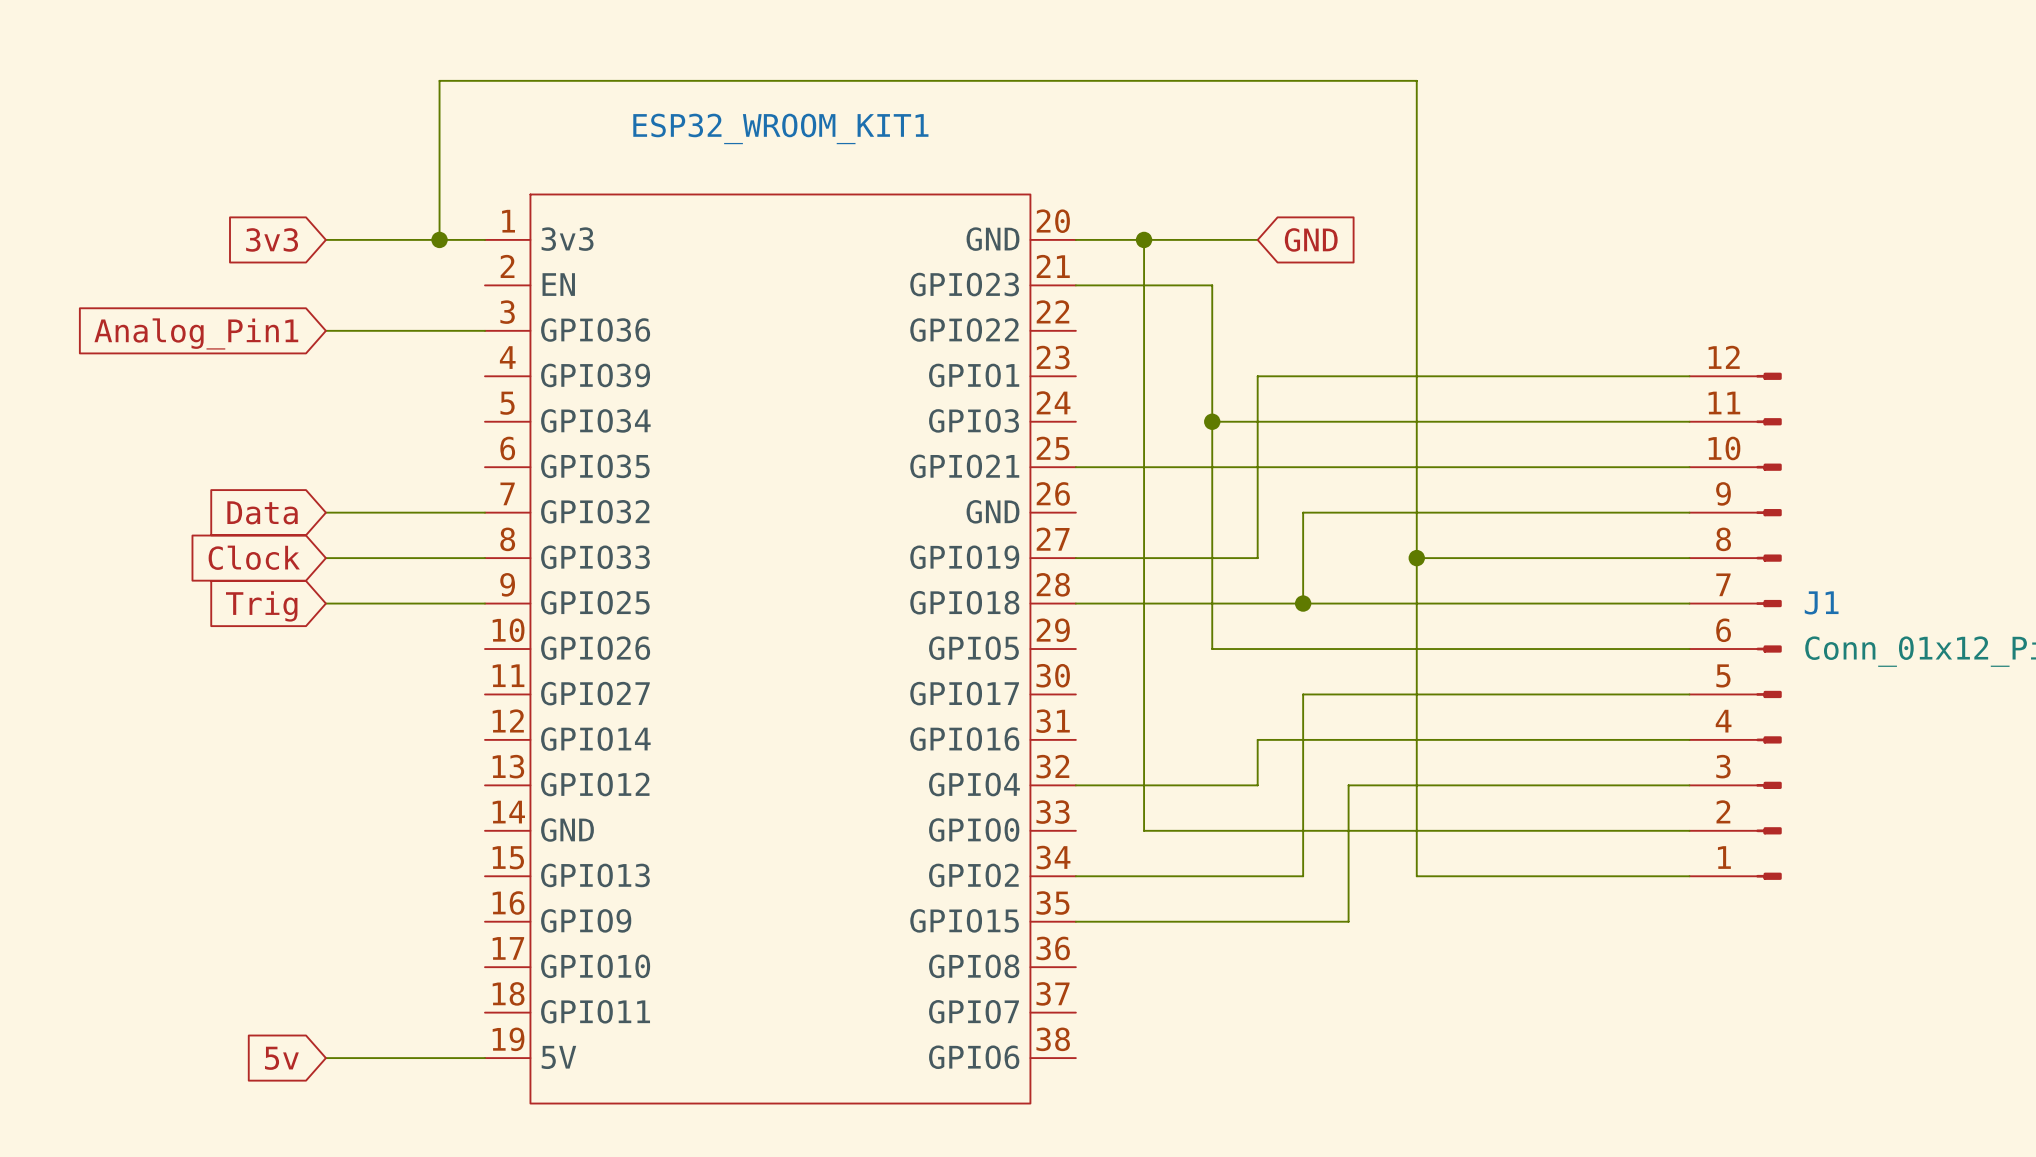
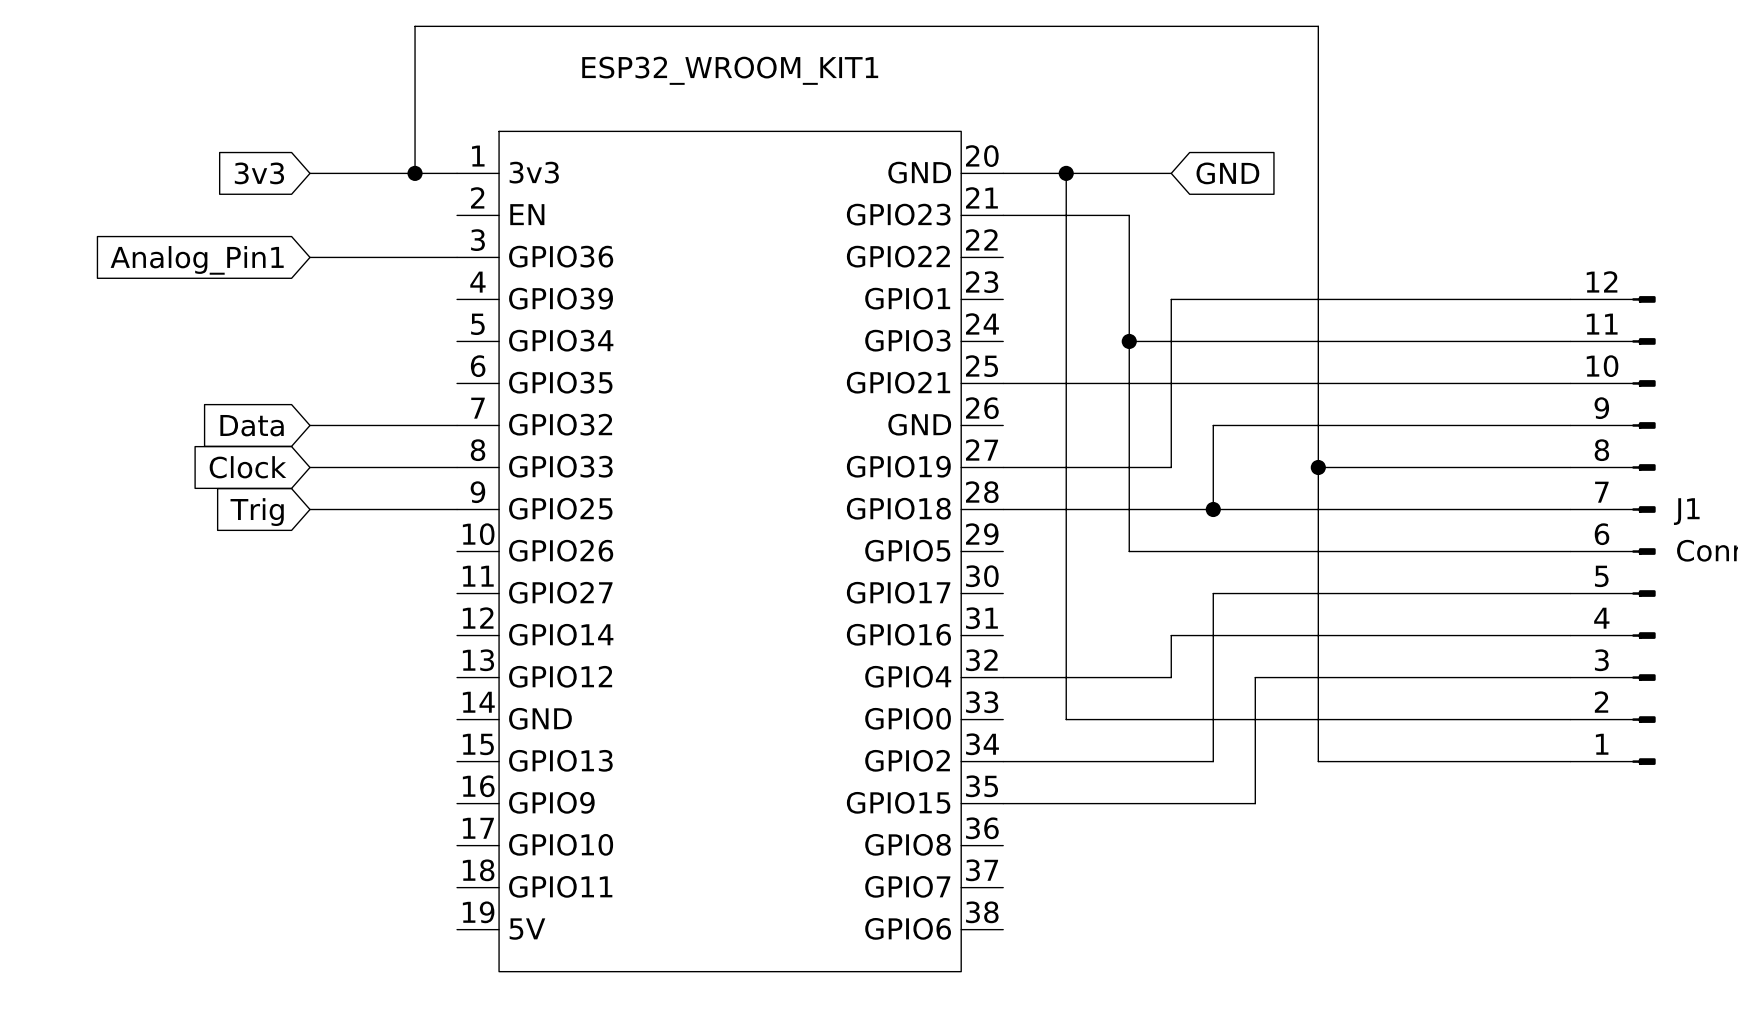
global label: 5v (281, 1058) -> none
wire: (325, 1058) (484, 1058) -> none

